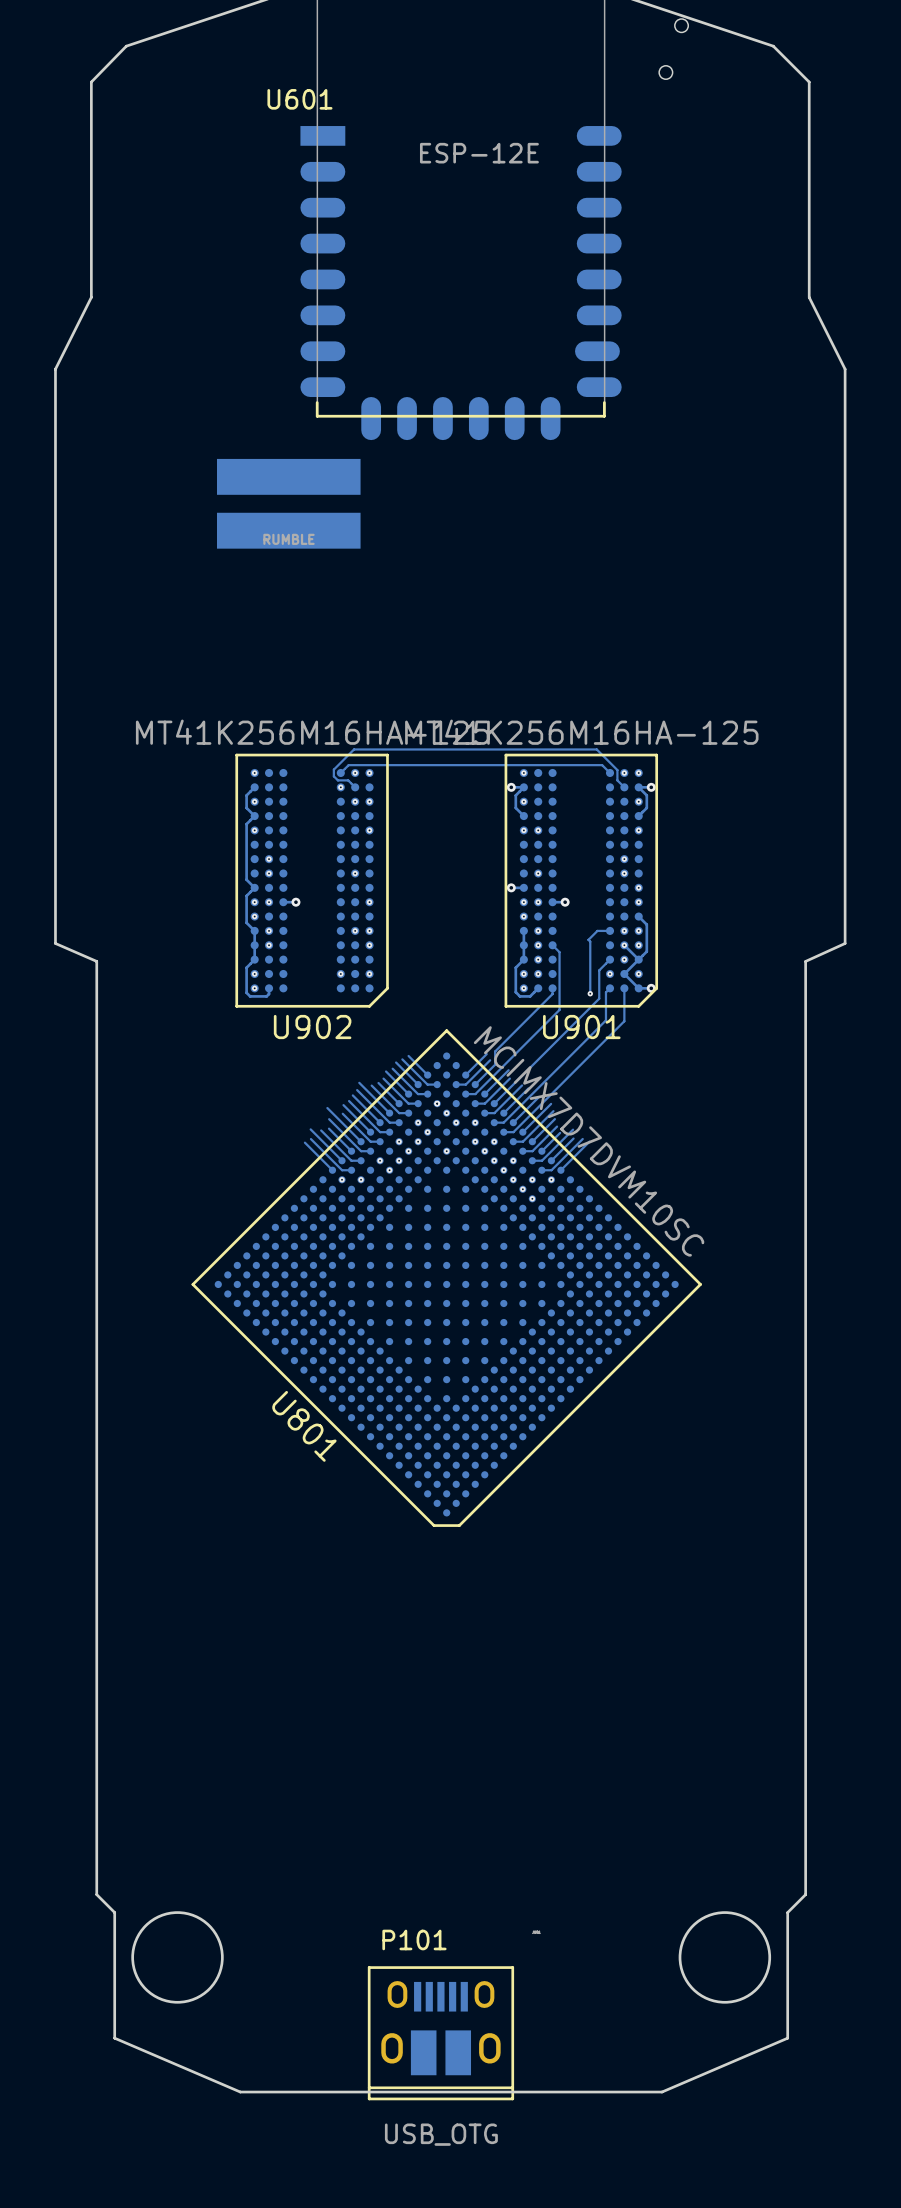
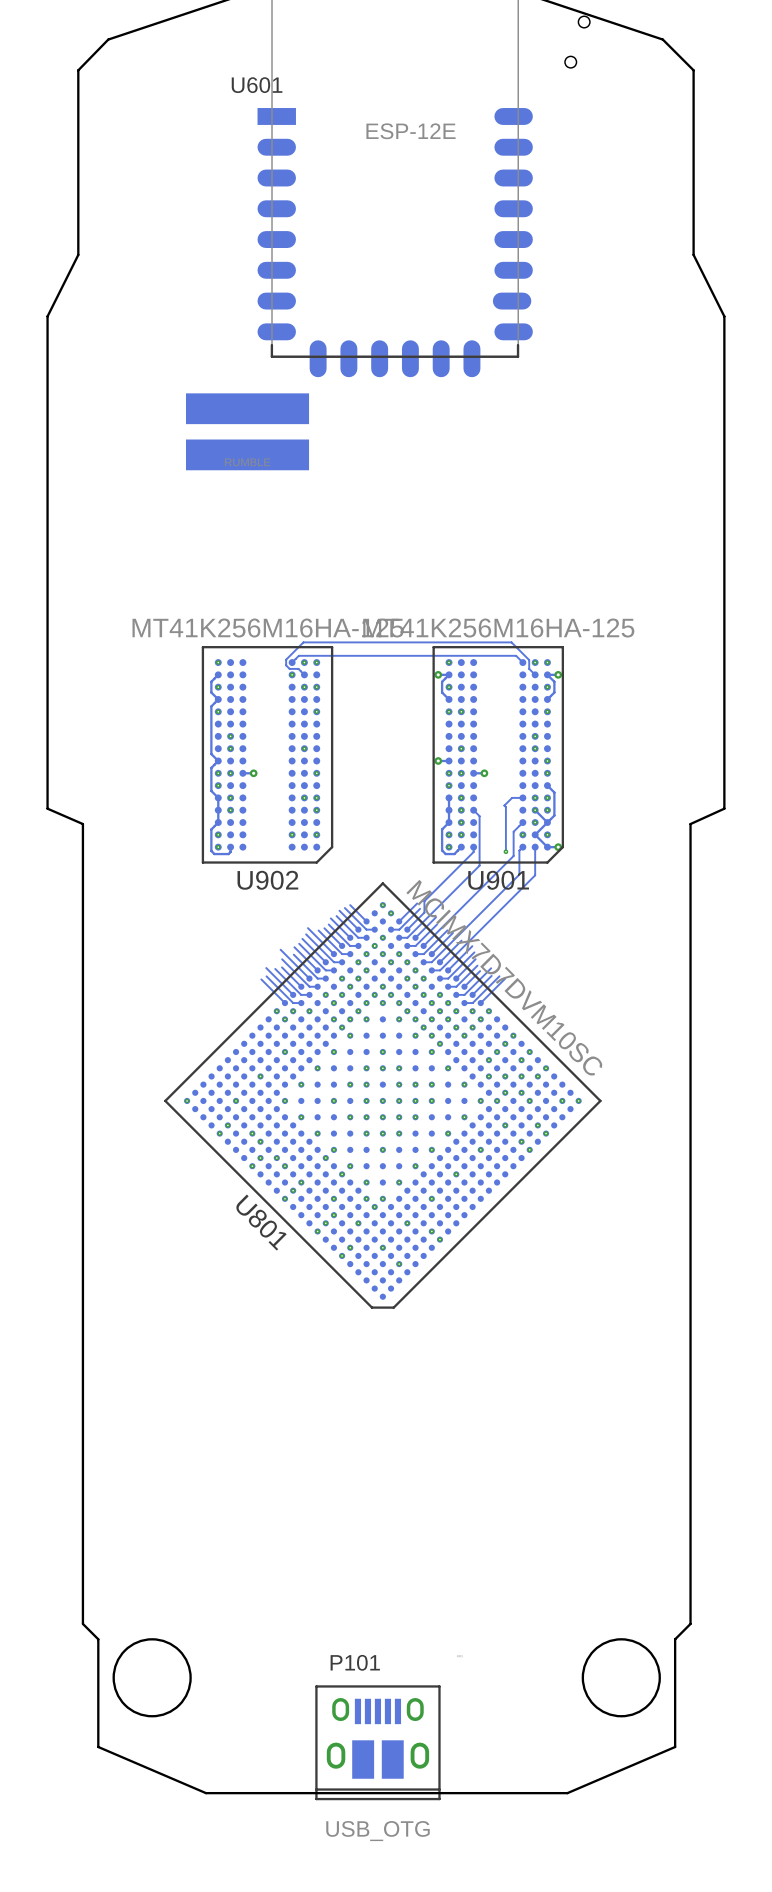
via: none -> (382, 905)
via: none -> (391, 913)
via: none -> (382, 937)
via: none -> (366, 954)
via: none -> (399, 954)
via: none -> (415, 970)
via: none -> (374, 994)
via: none -> (391, 994)
via: none -> (366, 1003)
via: none -> (382, 1003)
via: none -> (399, 1003)
via: none -> (448, 1003)
via: none -> (276, 1011)
via: none -> (358, 1011)
via: none -> (407, 1011)
via: none -> (488, 1011)
via: none -> (284, 1019)
via: none -> (333, 1019)
via: none -> (350, 1019)
via: none -> (366, 1019)
via: none -> (399, 1019)
via: none -> (415, 1019)
via: none -> (431, 1019)
via: none -> (480, 1019)
via: none -> (342, 1027)
via: none -> (423, 1027)
via: none -> (472, 1027)
via: none -> (350, 1035)
via: none -> (415, 1035)
via: none -> (431, 1035)
via: none -> (464, 1035)
via: none -> (513, 1035)
via: none -> (439, 1043)
via: none -> (505, 1043)
via: none -> (284, 1051)
via: none -> (333, 1051)
via: none -> (382, 1051)
via: none -> (431, 1051)
via: none -> (497, 1051)
via: none -> (529, 1051)
via: none -> (488, 1060)
via: none -> (521, 1060)
via: none -> (317, 1068)
via: none -> (366, 1068)
via: none -> (382, 1068)
via: none -> (399, 1068)
via: none -> (448, 1068)
via: none -> (546, 1068)
via: none -> (260, 1076)
via: none -> (488, 1076)
via: none -> (505, 1076)
via: none -> (521, 1076)
via: none -> (537, 1076)
via: none -> (301, 1084)
via: none -> (350, 1084)
via: none -> (366, 1084)
via: none -> (399, 1084)
via: none -> (415, 1084)
via: none -> (431, 1084)
via: none -> (464, 1084)
via: none -> (505, 1092)
via: none -> (521, 1092)
via: none -> (187, 1100)
via: none -> (236, 1100)
via: none -> (284, 1100)
via: none -> (333, 1100)
via: none -> (366, 1100)
via: none -> (382, 1100)
via: none -> (399, 1100)
via: none -> (415, 1100)
via: none -> (431, 1100)
via: none -> (480, 1100)
via: none -> (497, 1100)
via: none -> (529, 1100)
via: none -> (562, 1100)
via: none -> (578, 1100)
via: none -> (301, 1117)
via: none -> (350, 1117)
via: none -> (366, 1117)
via: none -> (382, 1117)
via: none -> (399, 1117)
via: none -> (415, 1117)
via: none -> (464, 1117)
via: none -> (227, 1125)
via: none -> (505, 1125)
via: none -> (537, 1125)
via: none -> (219, 1133)
via: none -> (252, 1133)
via: none -> (317, 1133)
via: none -> (366, 1133)
via: none -> (382, 1133)
via: none -> (399, 1133)
via: none -> (448, 1133)
via: none -> (546, 1133)
via: none -> (260, 1141)
via: none -> (521, 1141)
via: none -> (333, 1149)
via: none -> (382, 1149)
via: none -> (431, 1149)
via: none -> (480, 1149)
via: none -> (529, 1149)
via: none -> (260, 1158)
via: none -> (276, 1158)
via: none -> (325, 1158)
via: none -> (252, 1166)
via: none -> (284, 1166)
via: none -> (350, 1166)
via: none -> (415, 1166)
via: none -> (342, 1174)
via: none -> (456, 1174)
via: none -> (301, 1182)
via: none -> (366, 1182)
via: none -> (399, 1182)
via: none -> (293, 1190)
via: none -> (284, 1198)
via: none -> (333, 1198)
via: none -> (366, 1198)
via: none -> (382, 1198)
via: none -> (431, 1198)
via: none -> (374, 1206)
via: none -> (333, 1215)
via: none -> (325, 1223)
via: none -> (358, 1223)
via: none -> (407, 1223)
via: none -> (317, 1231)
via: none -> (431, 1231)
via: none -> (439, 1239)
via: none -> (350, 1247)
via: none -> (382, 1247)
via: none -> (342, 1255)
via: none -> (399, 1264)

